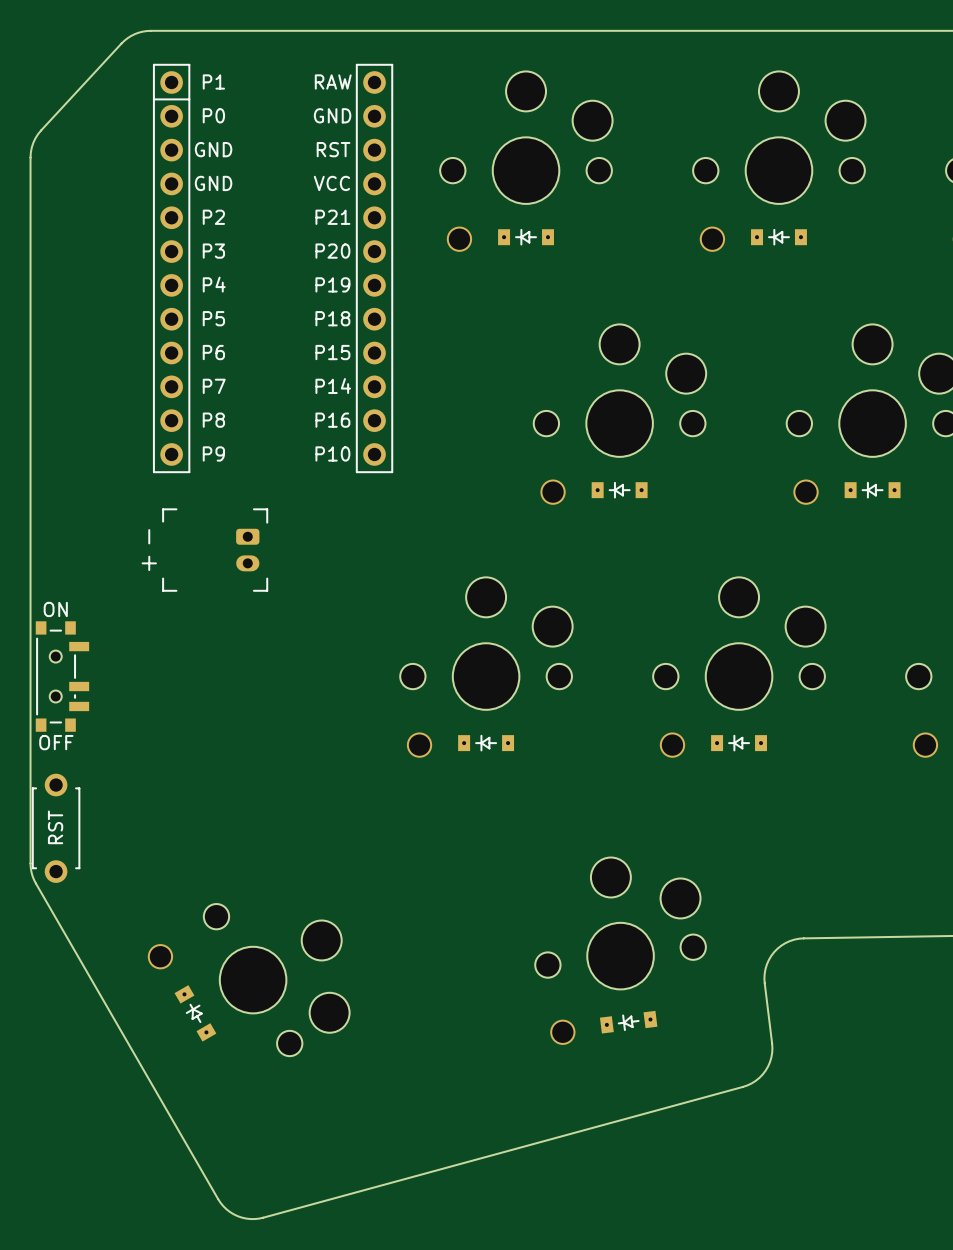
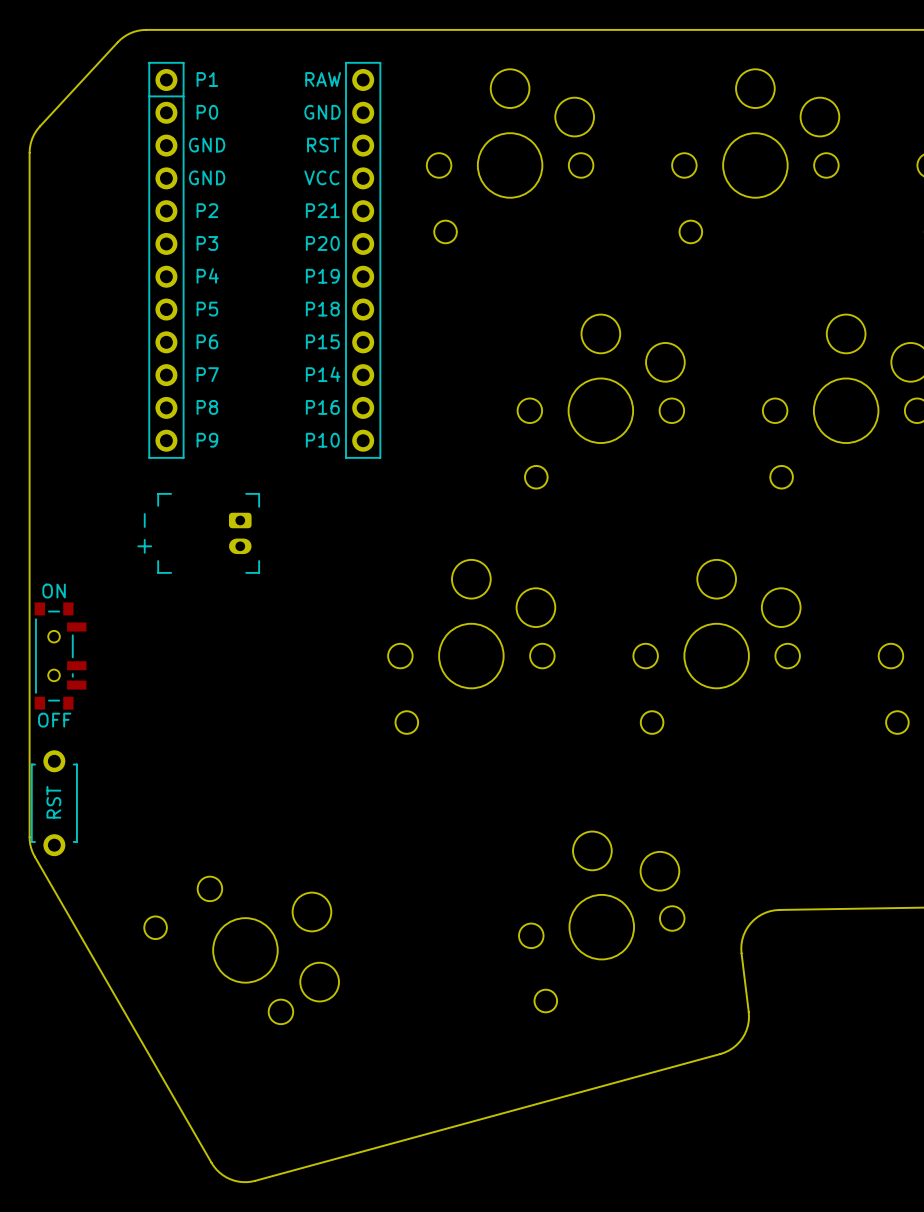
part: (526, 237) -> none
part: (778, 237) -> none
part: (619, 490) -> none
part: (872, 490) -> none
part: (486, 743) -> none
part: (739, 743) -> none
part: (195, 1013) -> none
part: (628, 1022) -> none

